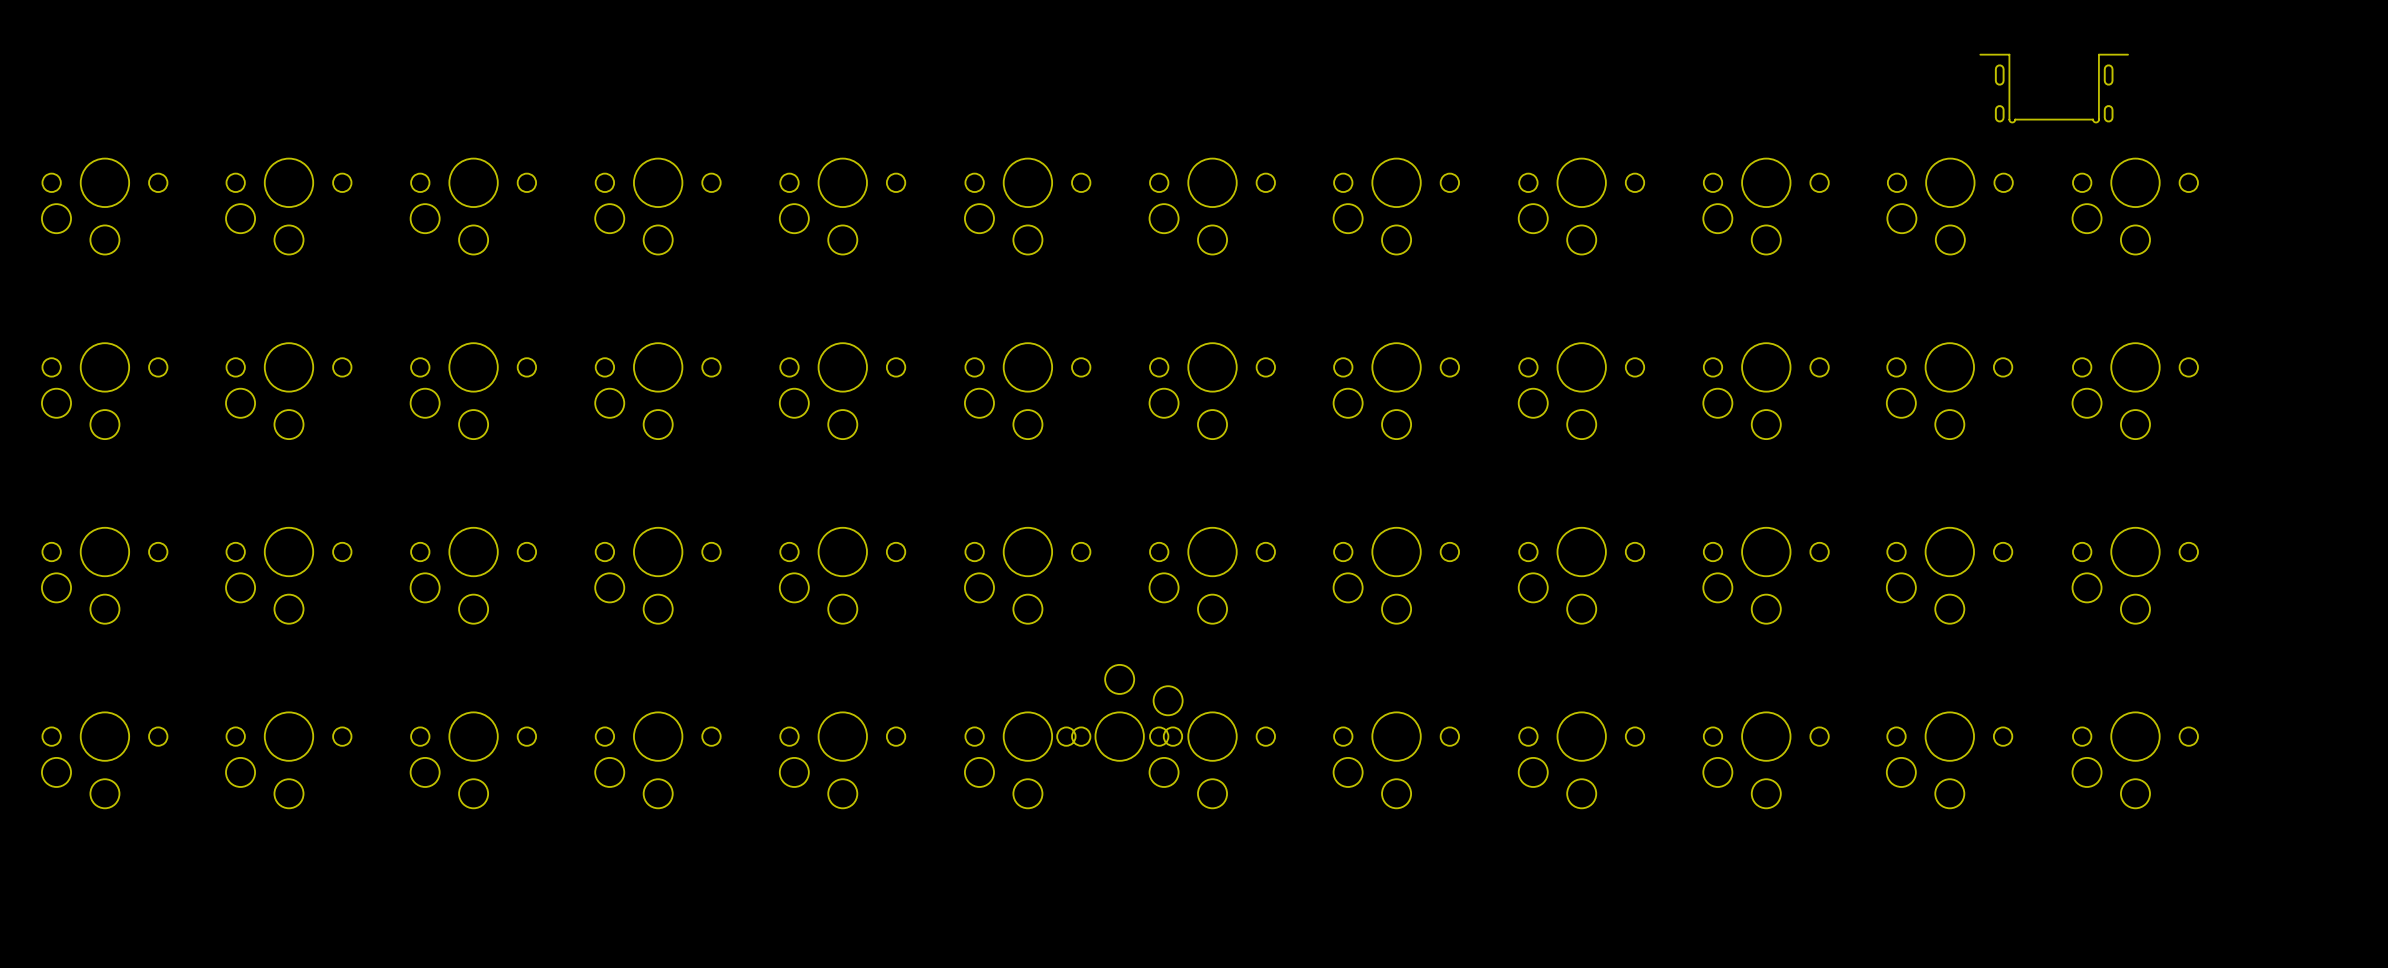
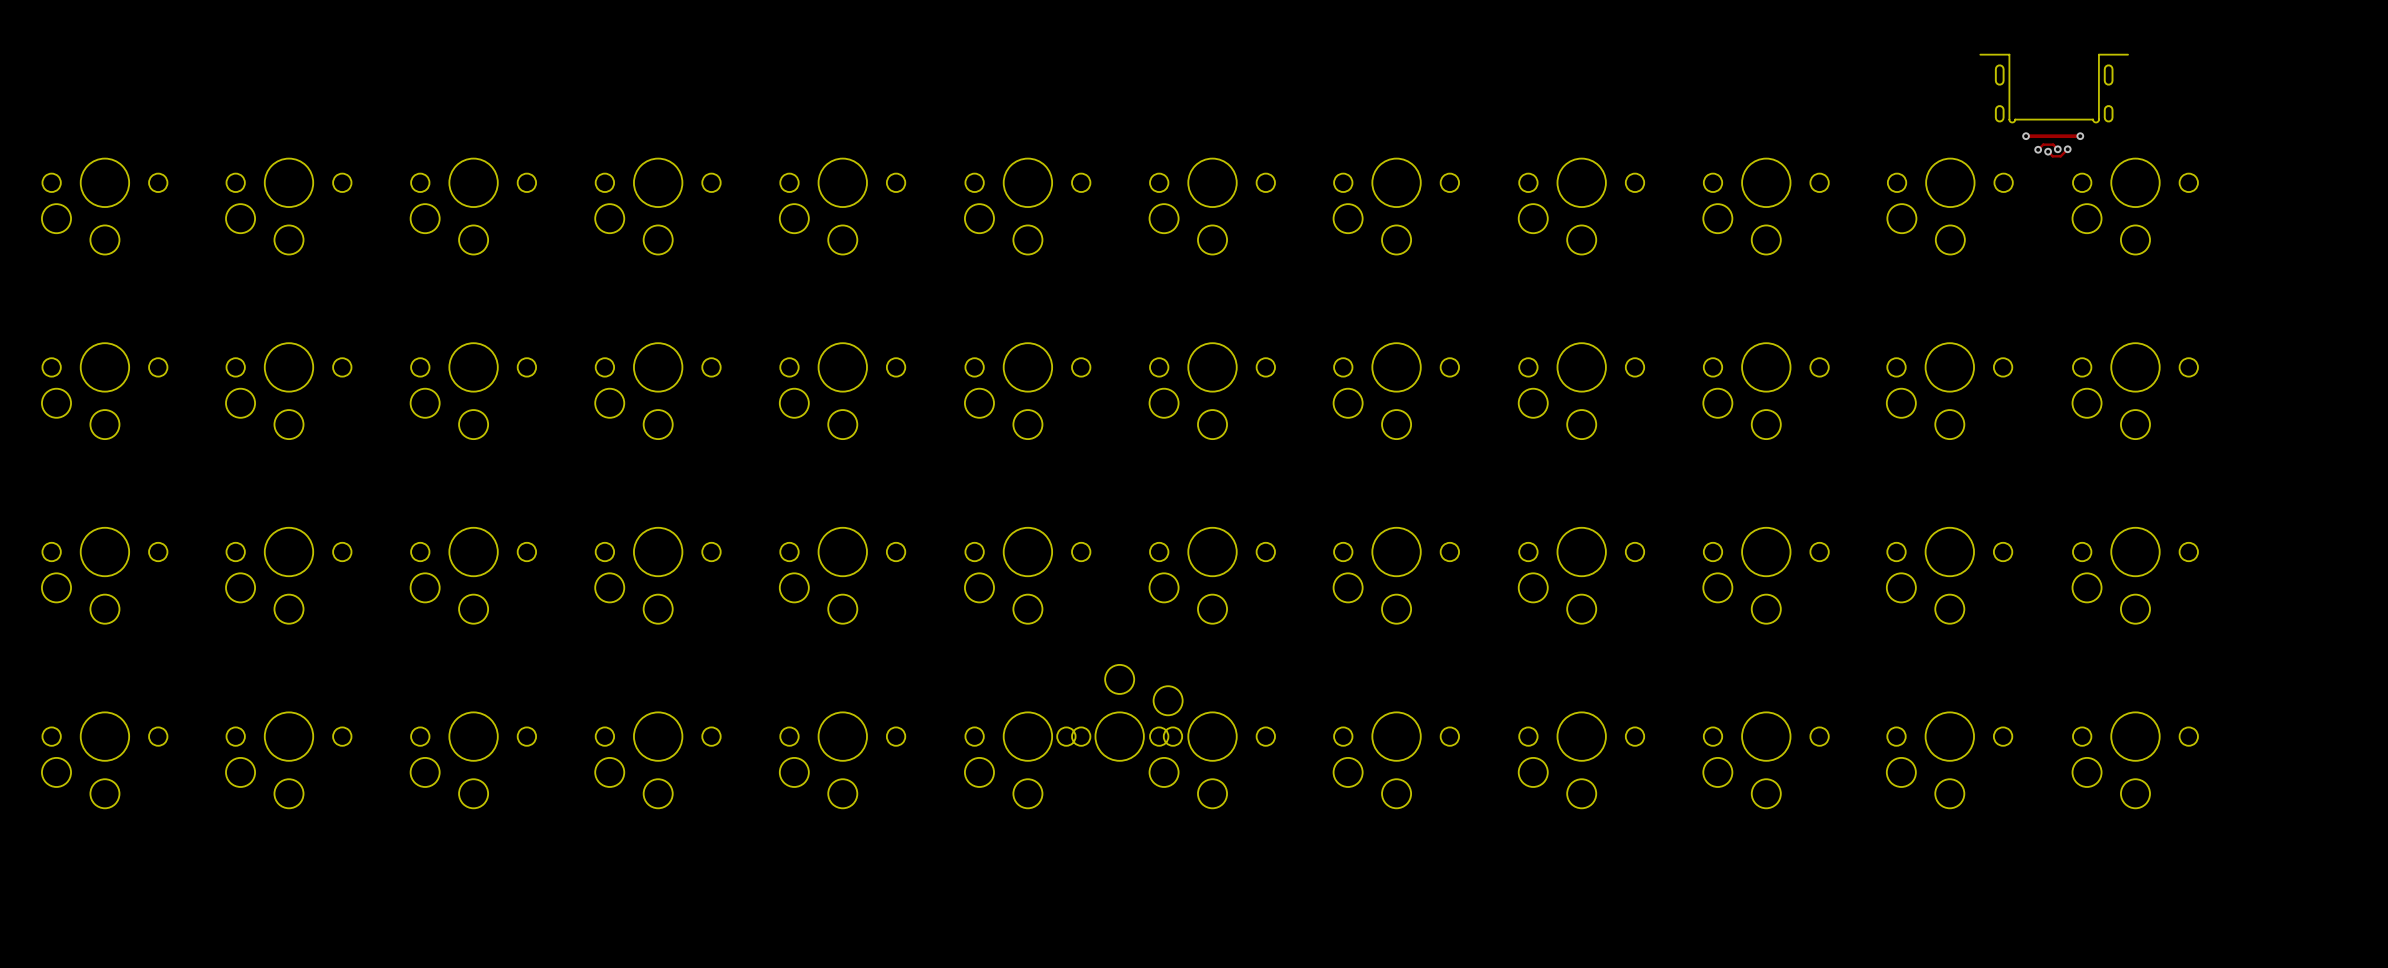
track: none -> (2026, 136) (2080, 136)
via: none -> (2026, 136)
via: none -> (2080, 136)
via: none -> (2038, 149)
track: none -> (2057, 149) (2053, 144) (2043, 144) (2038, 149)
via: none -> (2057, 149)
track: none -> (2067, 149) (2060, 156) (2052, 156) (2048, 151)
via: none -> (2067, 149)
via: none -> (2048, 151)

